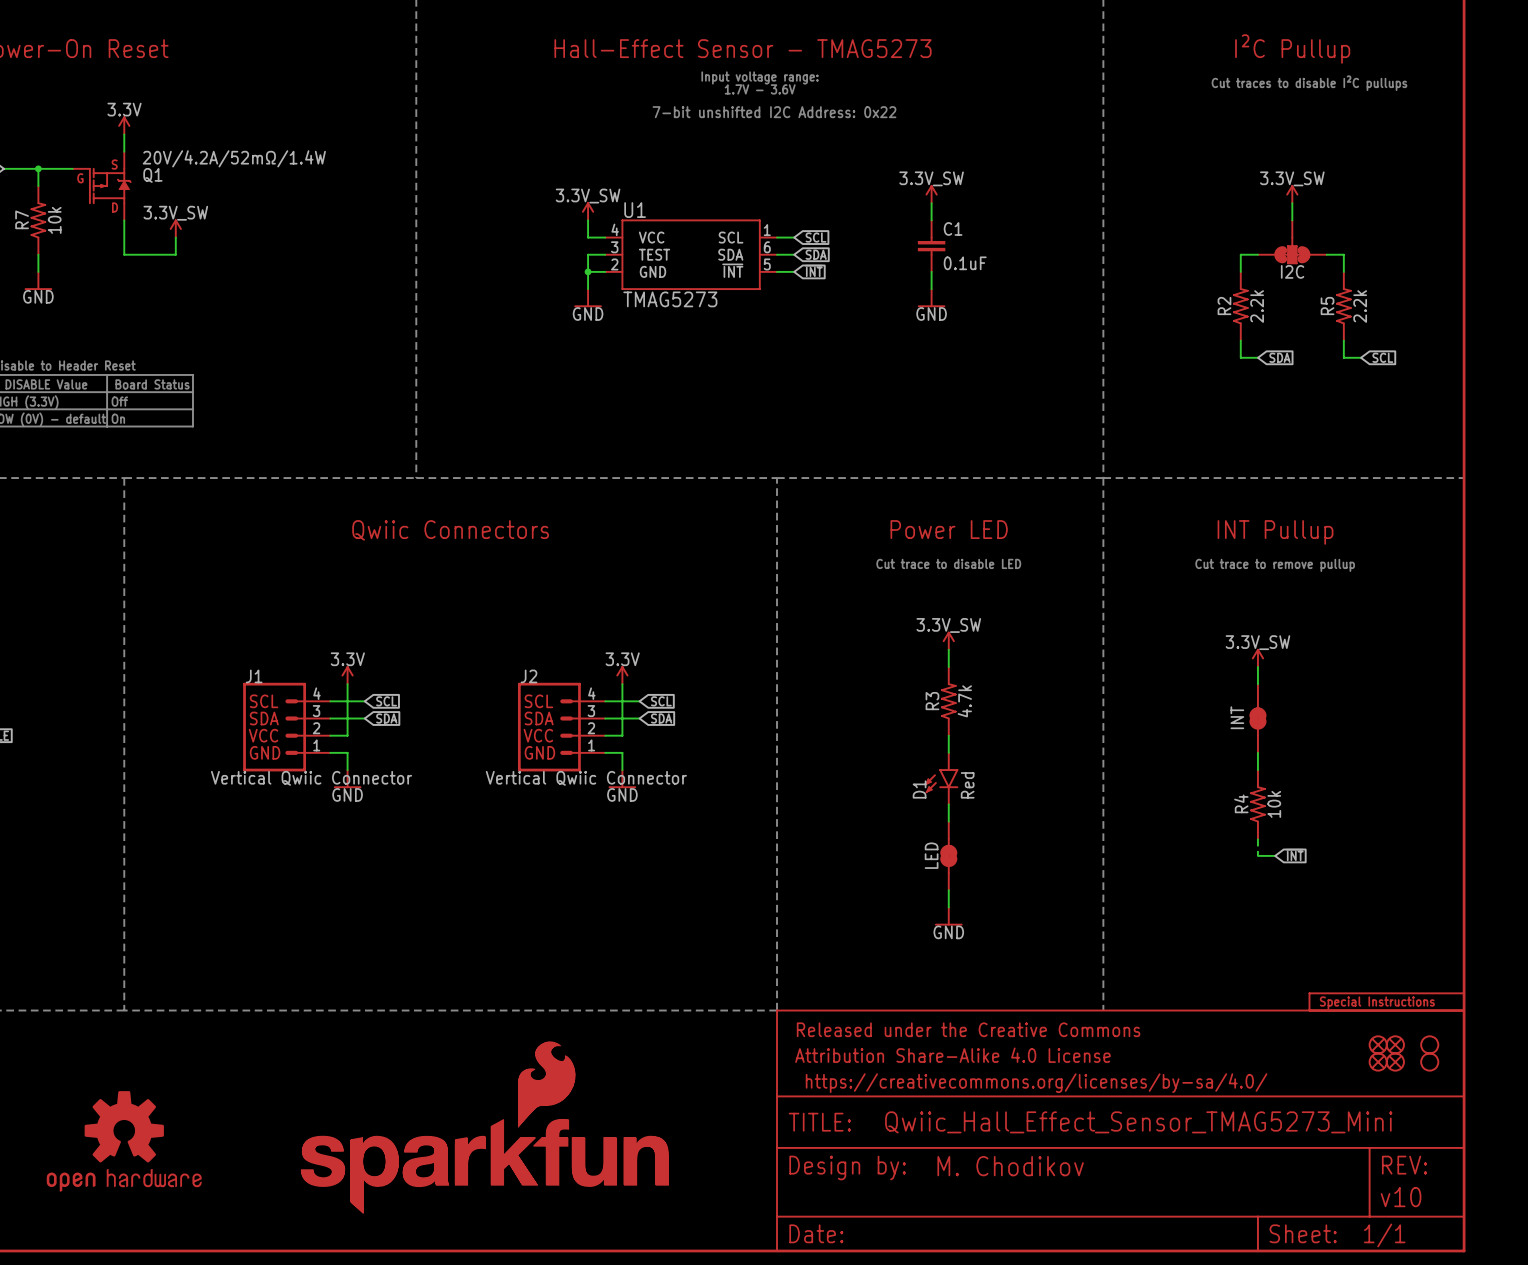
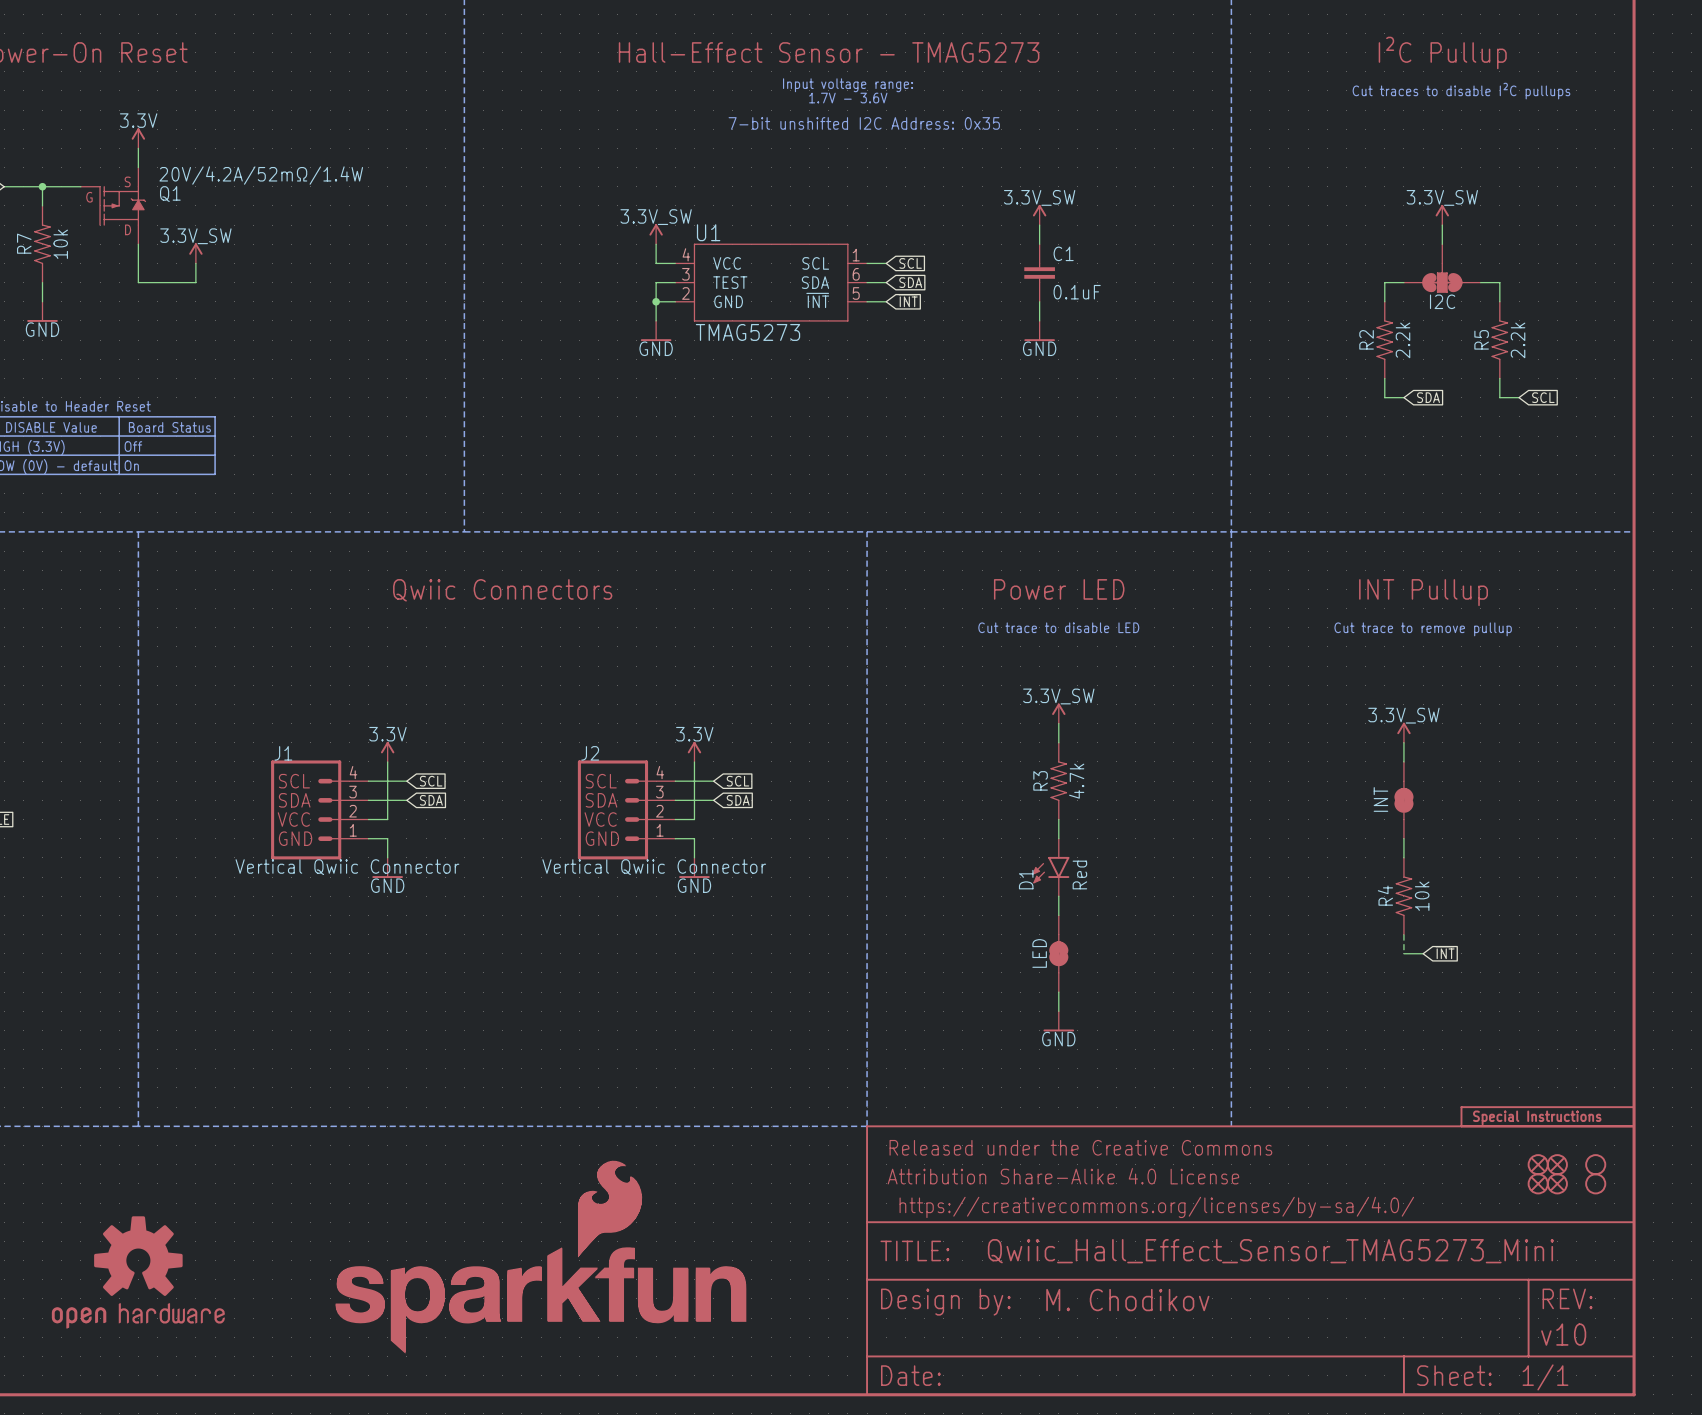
text: 7-bit unshifted I2C Address: 0x22 (774, 112) -> 7-bit unshifted I2C Address: 0x35 (864, 123)

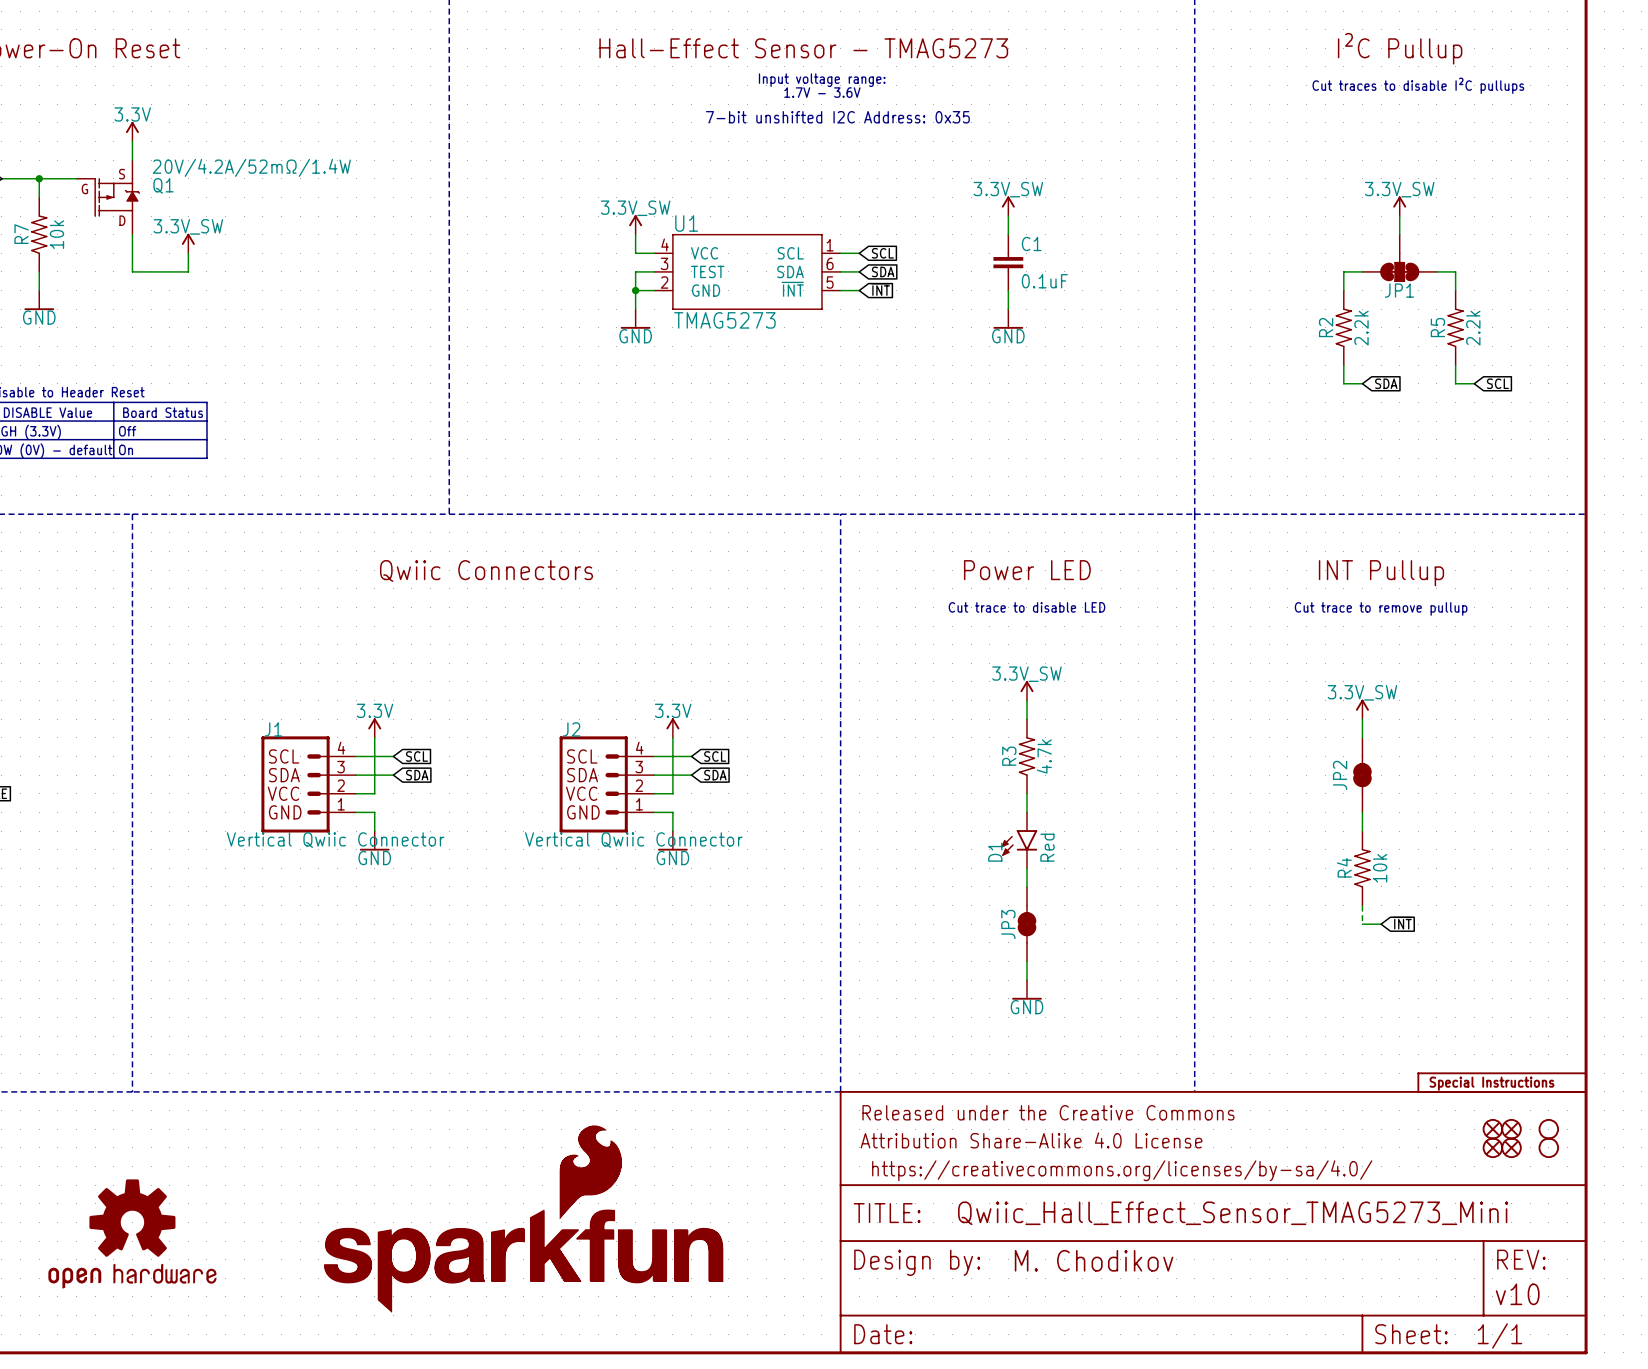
I2C name: I2C (1442, 301) -> JP1 (1399, 290)
INT name: INT (1380, 799) -> JP2 (1340, 775)
LED name: LED (1039, 953) -> JP3 (1008, 924)

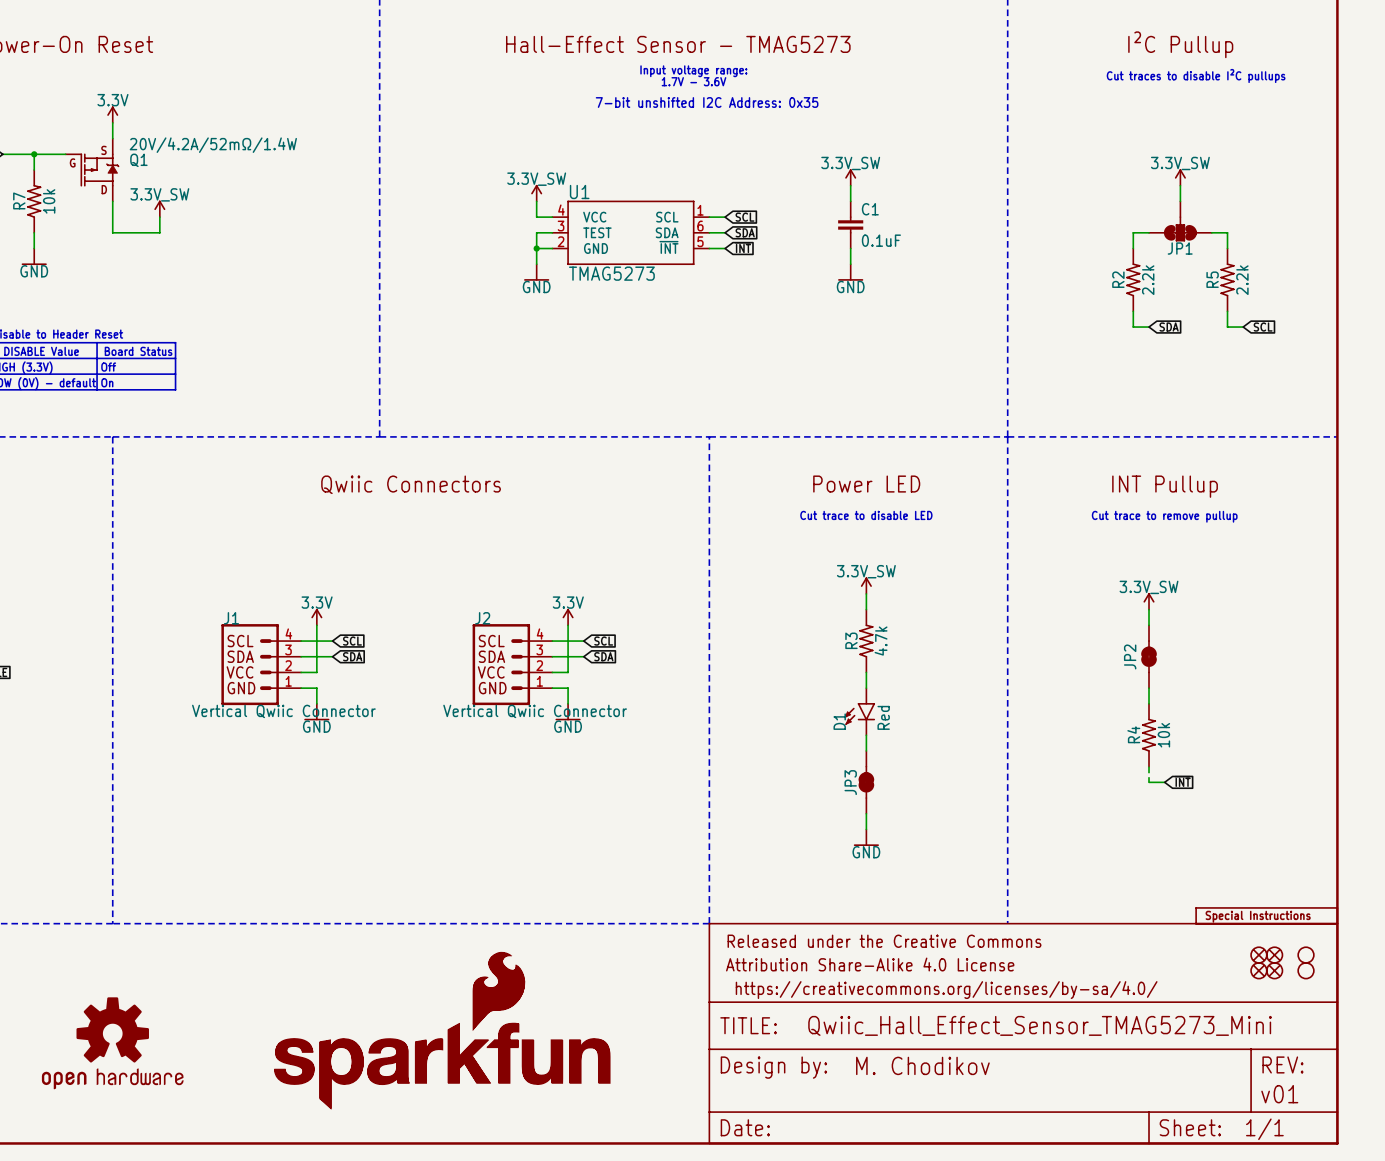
part text: v10 (1517, 1294) -> v01 (1279, 1094)

